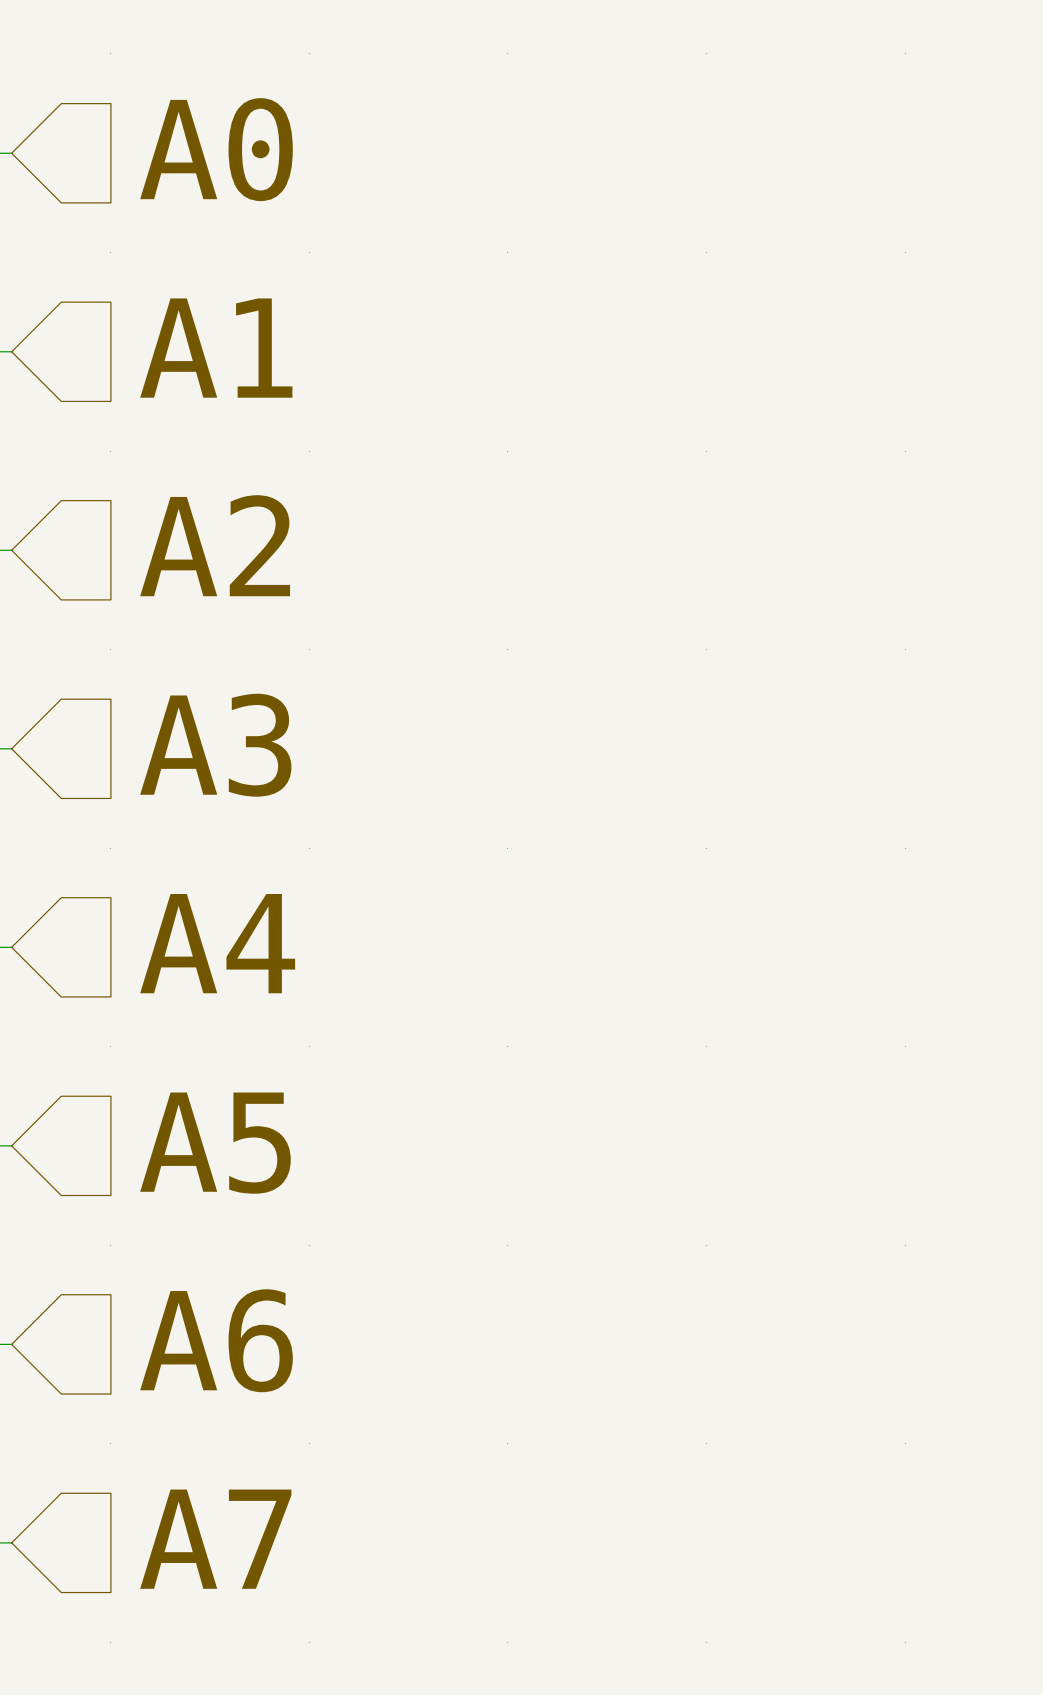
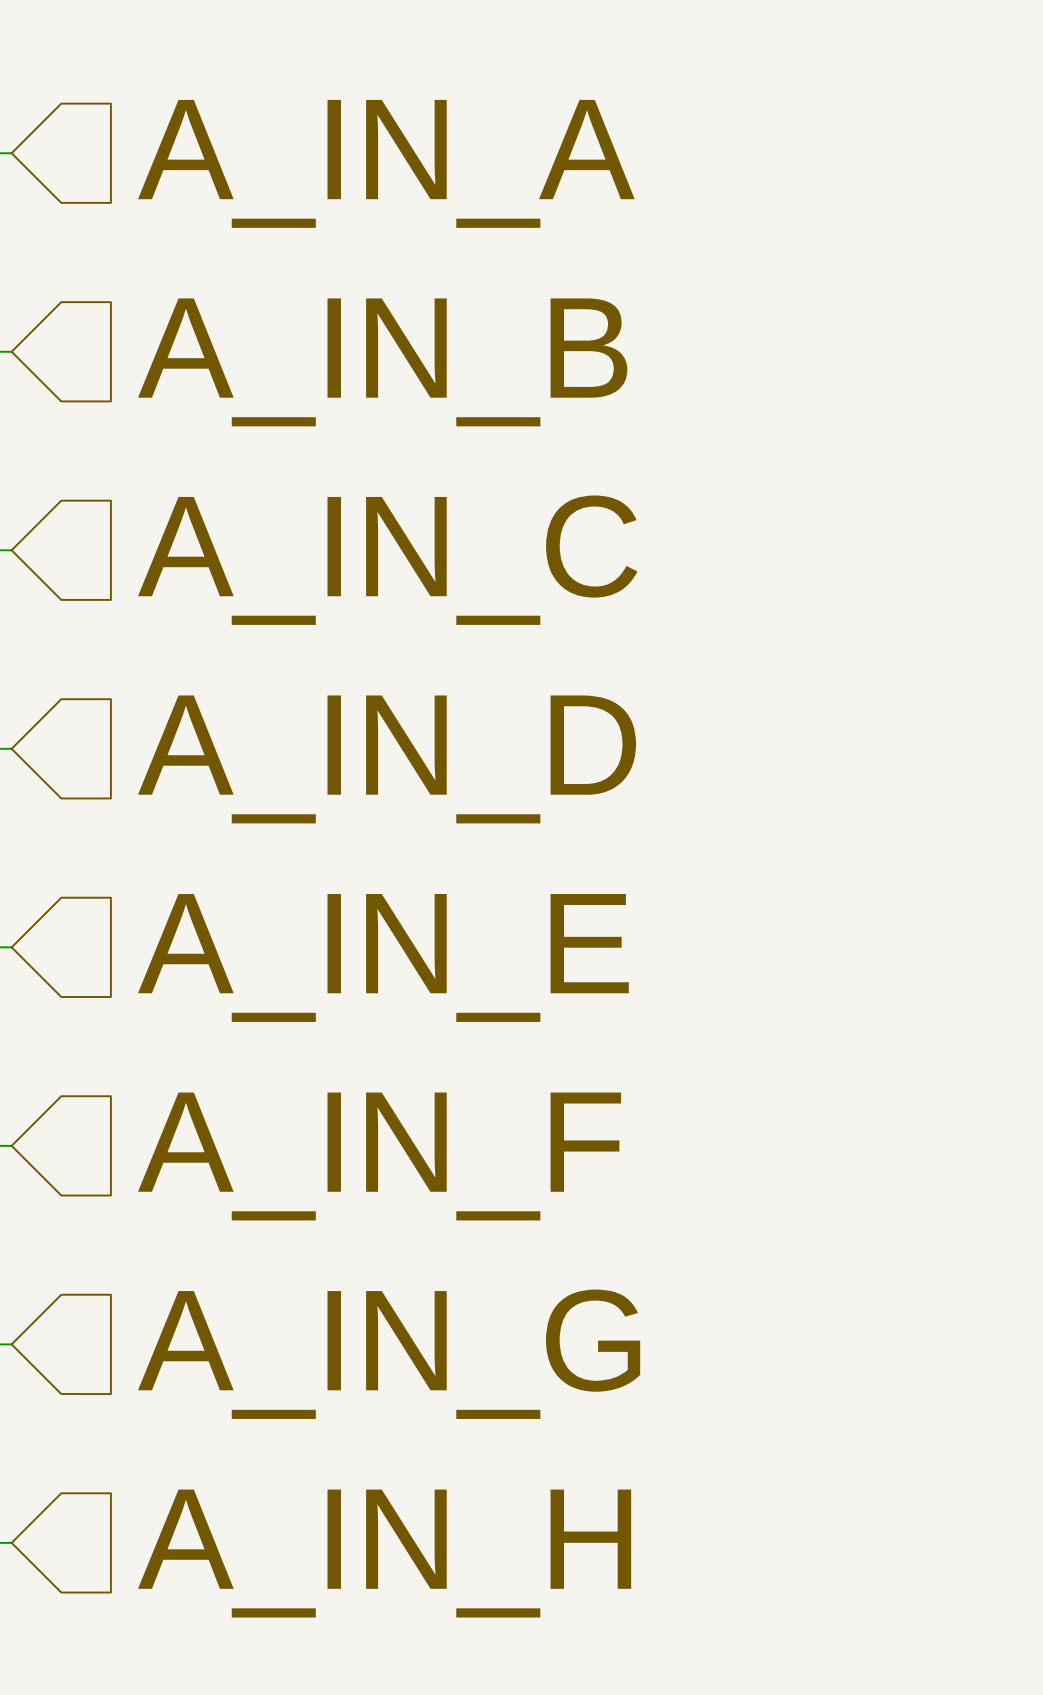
hierarchical label: A0 (216, 149) -> A_IN_A (386, 163)
hierarchical label: A1 (216, 348) -> A_IN_B (382, 362)
hierarchical label: A2 (215, 545) -> A_IN_C (387, 560)
hierarchical label: A3 (215, 745) -> A_IN_D (387, 759)
hierarchical label: A4 (217, 943) -> A_IN_E (383, 957)
hierarchical label: A5 (215, 1143) -> A_IN_F (379, 1156)
hierarchical label: A6 (216, 1340) -> A_IN_G (389, 1354)
hierarchical label: A7 (215, 1539) -> A_IN_H (384, 1553)

